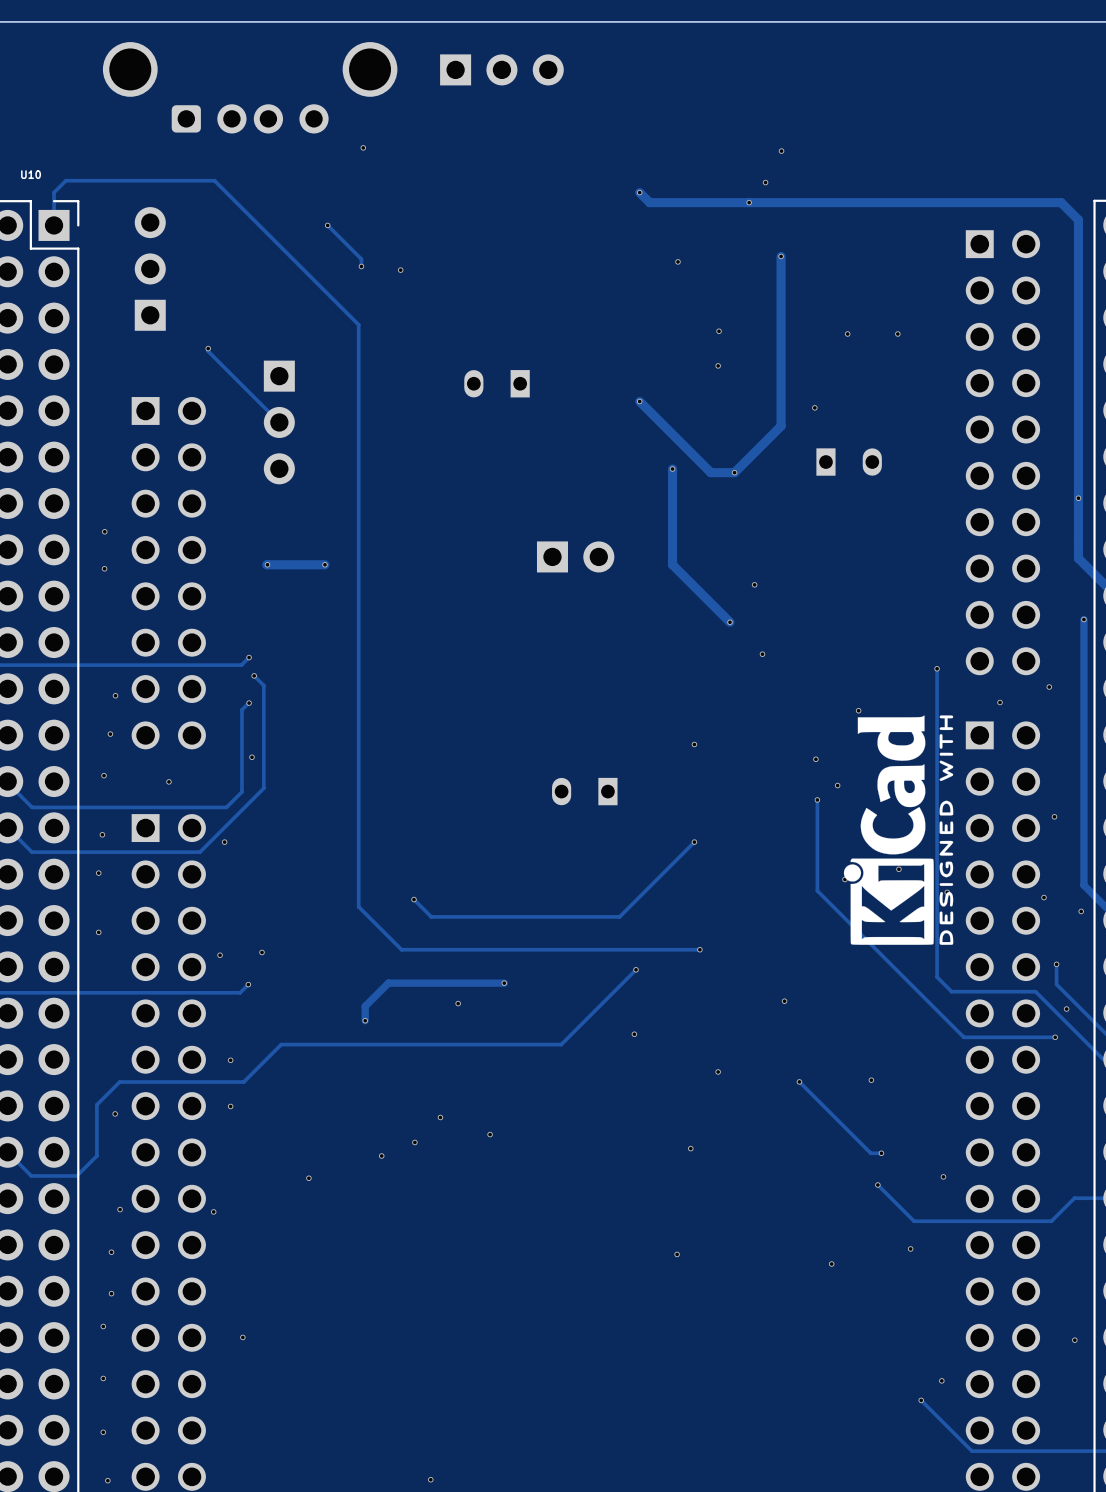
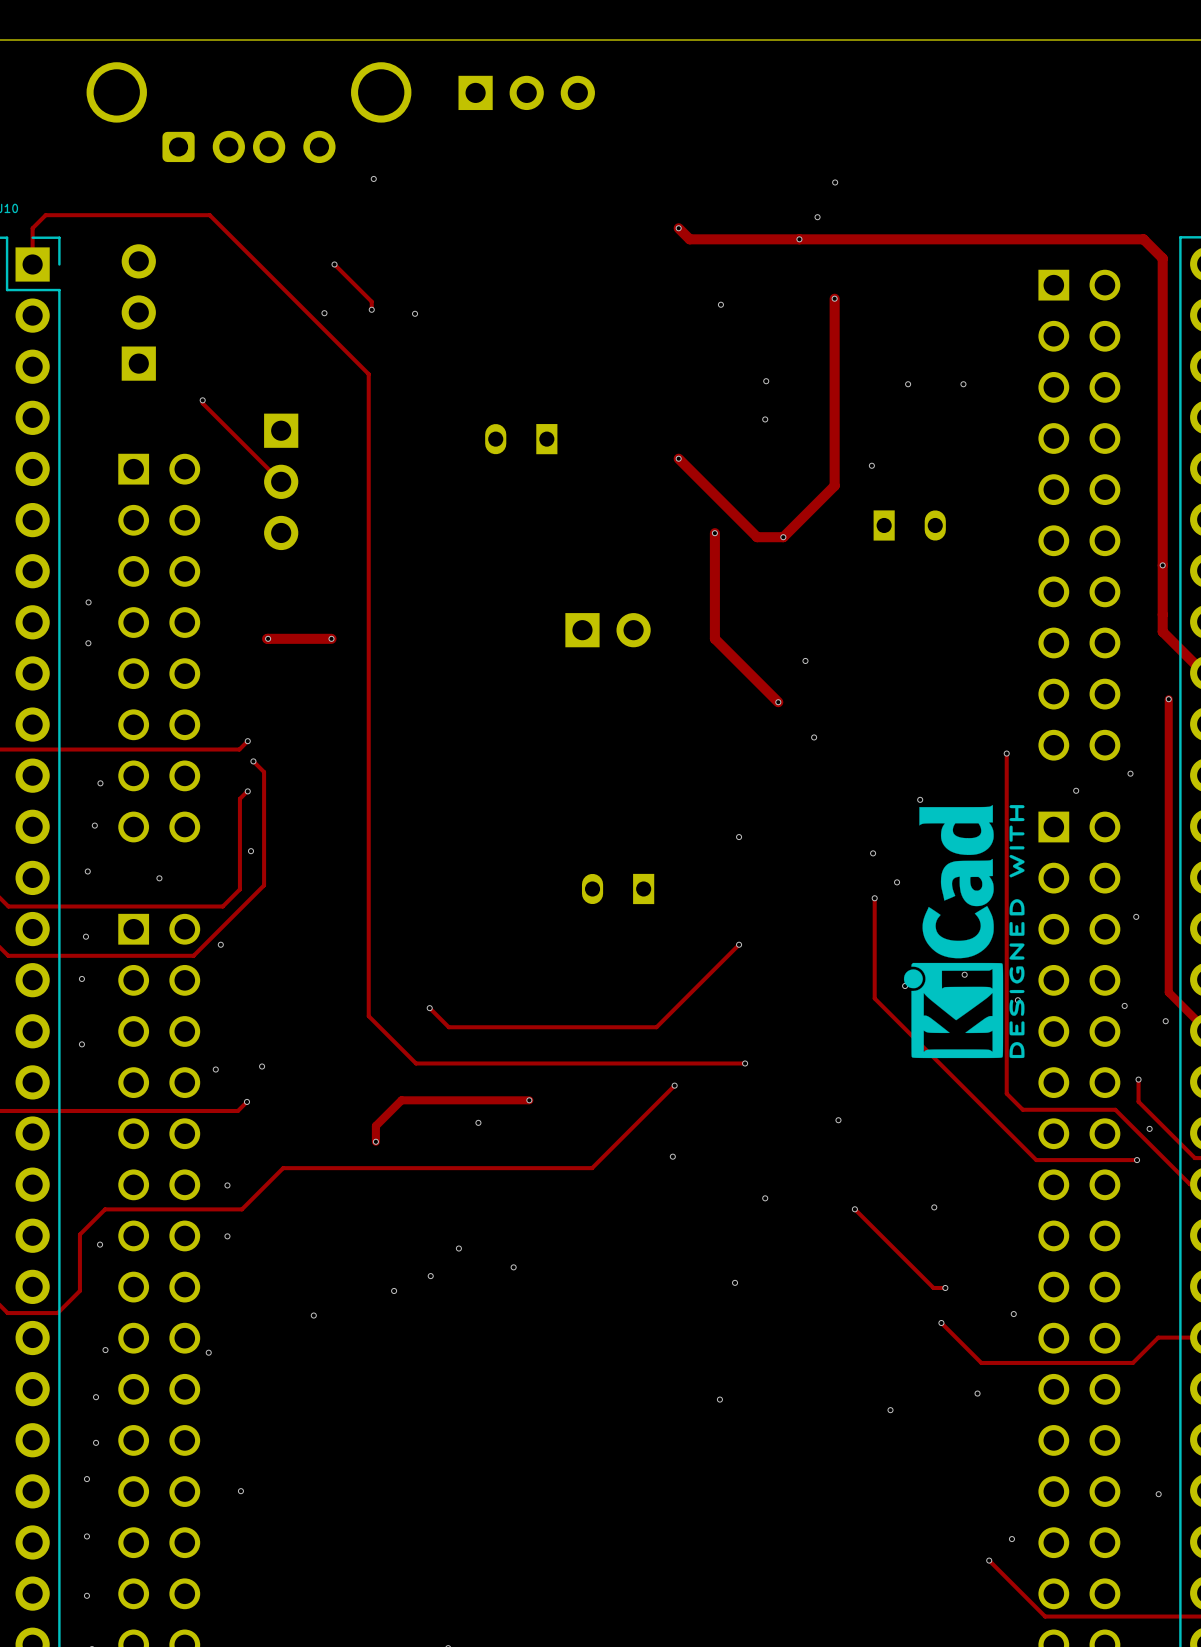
via: none -> (324, 313)

